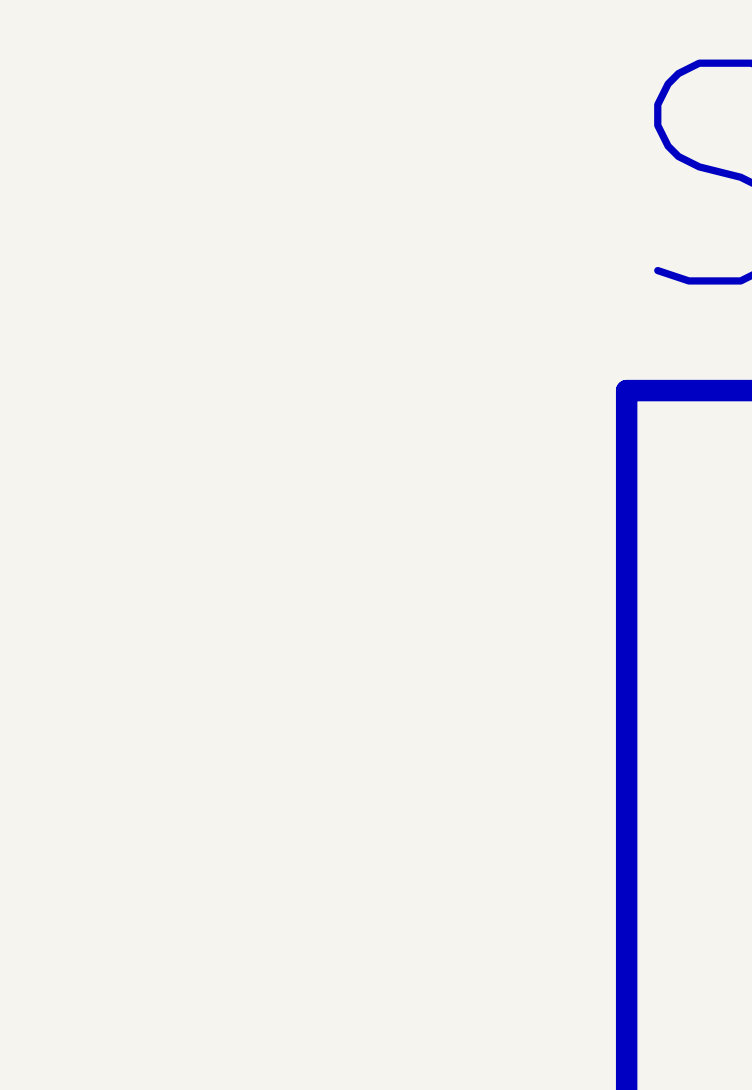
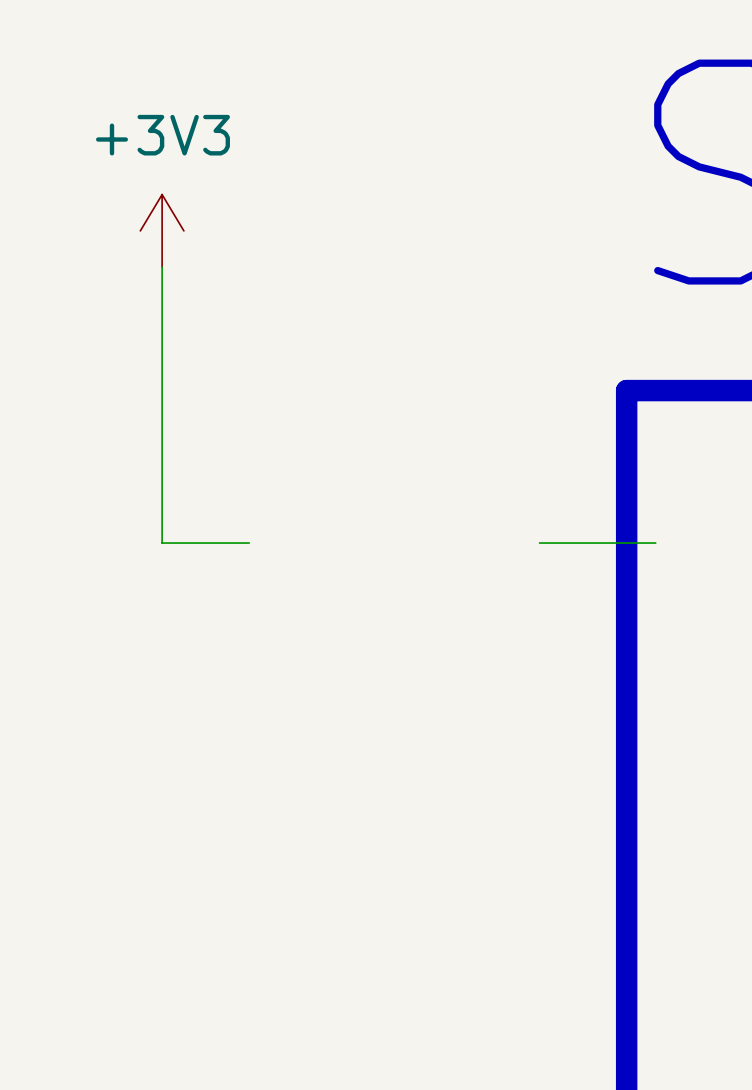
power symbol: none -> +3V3 (162, 230)
wire: none -> (162, 267) (162, 543) (249, 543)
wire: none -> (539, 543) (655, 543)

